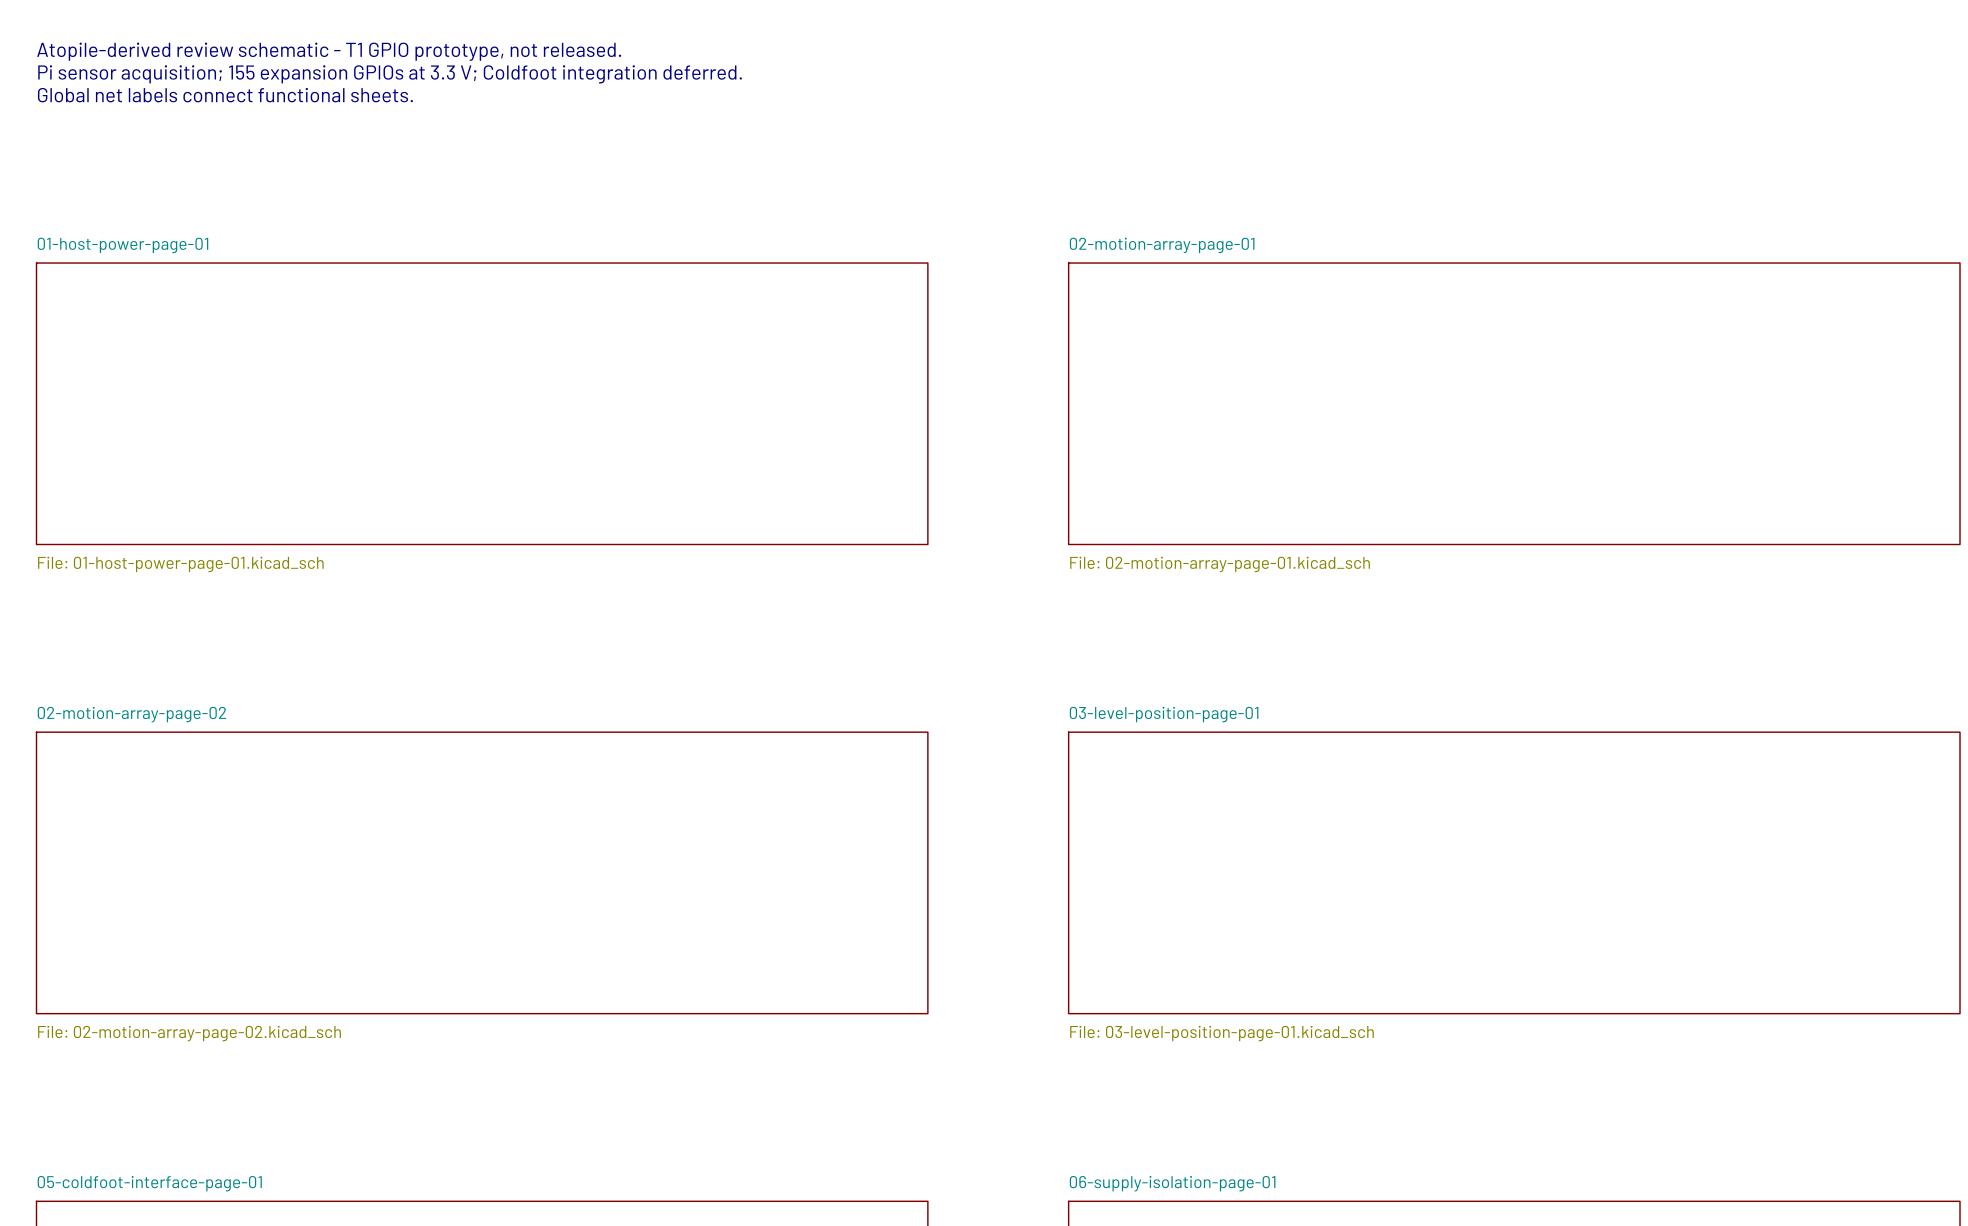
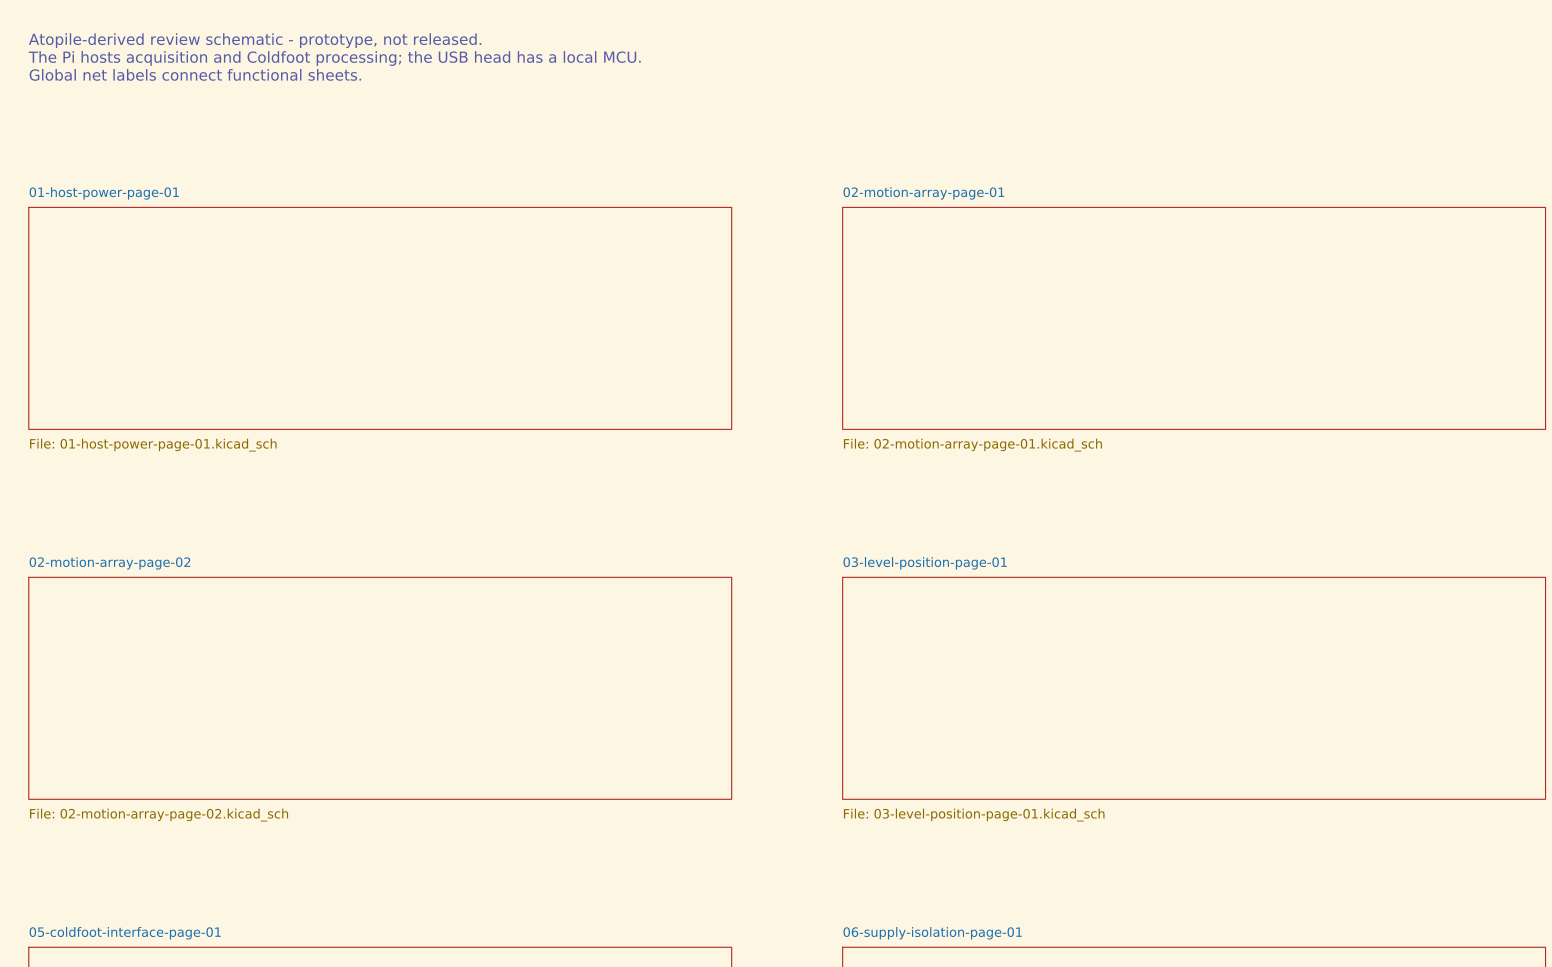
text: Atopile-derived review schematic - T1 GPIO prototype, not released. (329, 51) -> Atopile-derived review schematic - prototype, not released. (255, 40)
text: Pi sensor acquisition; 155 expansion GPIOs at 3.3 V; Coldfoot integration deferred. (390, 74) -> The Pi hosts acquisition and Coldfoot processing; the USB head has a local MCU. (334, 58)

